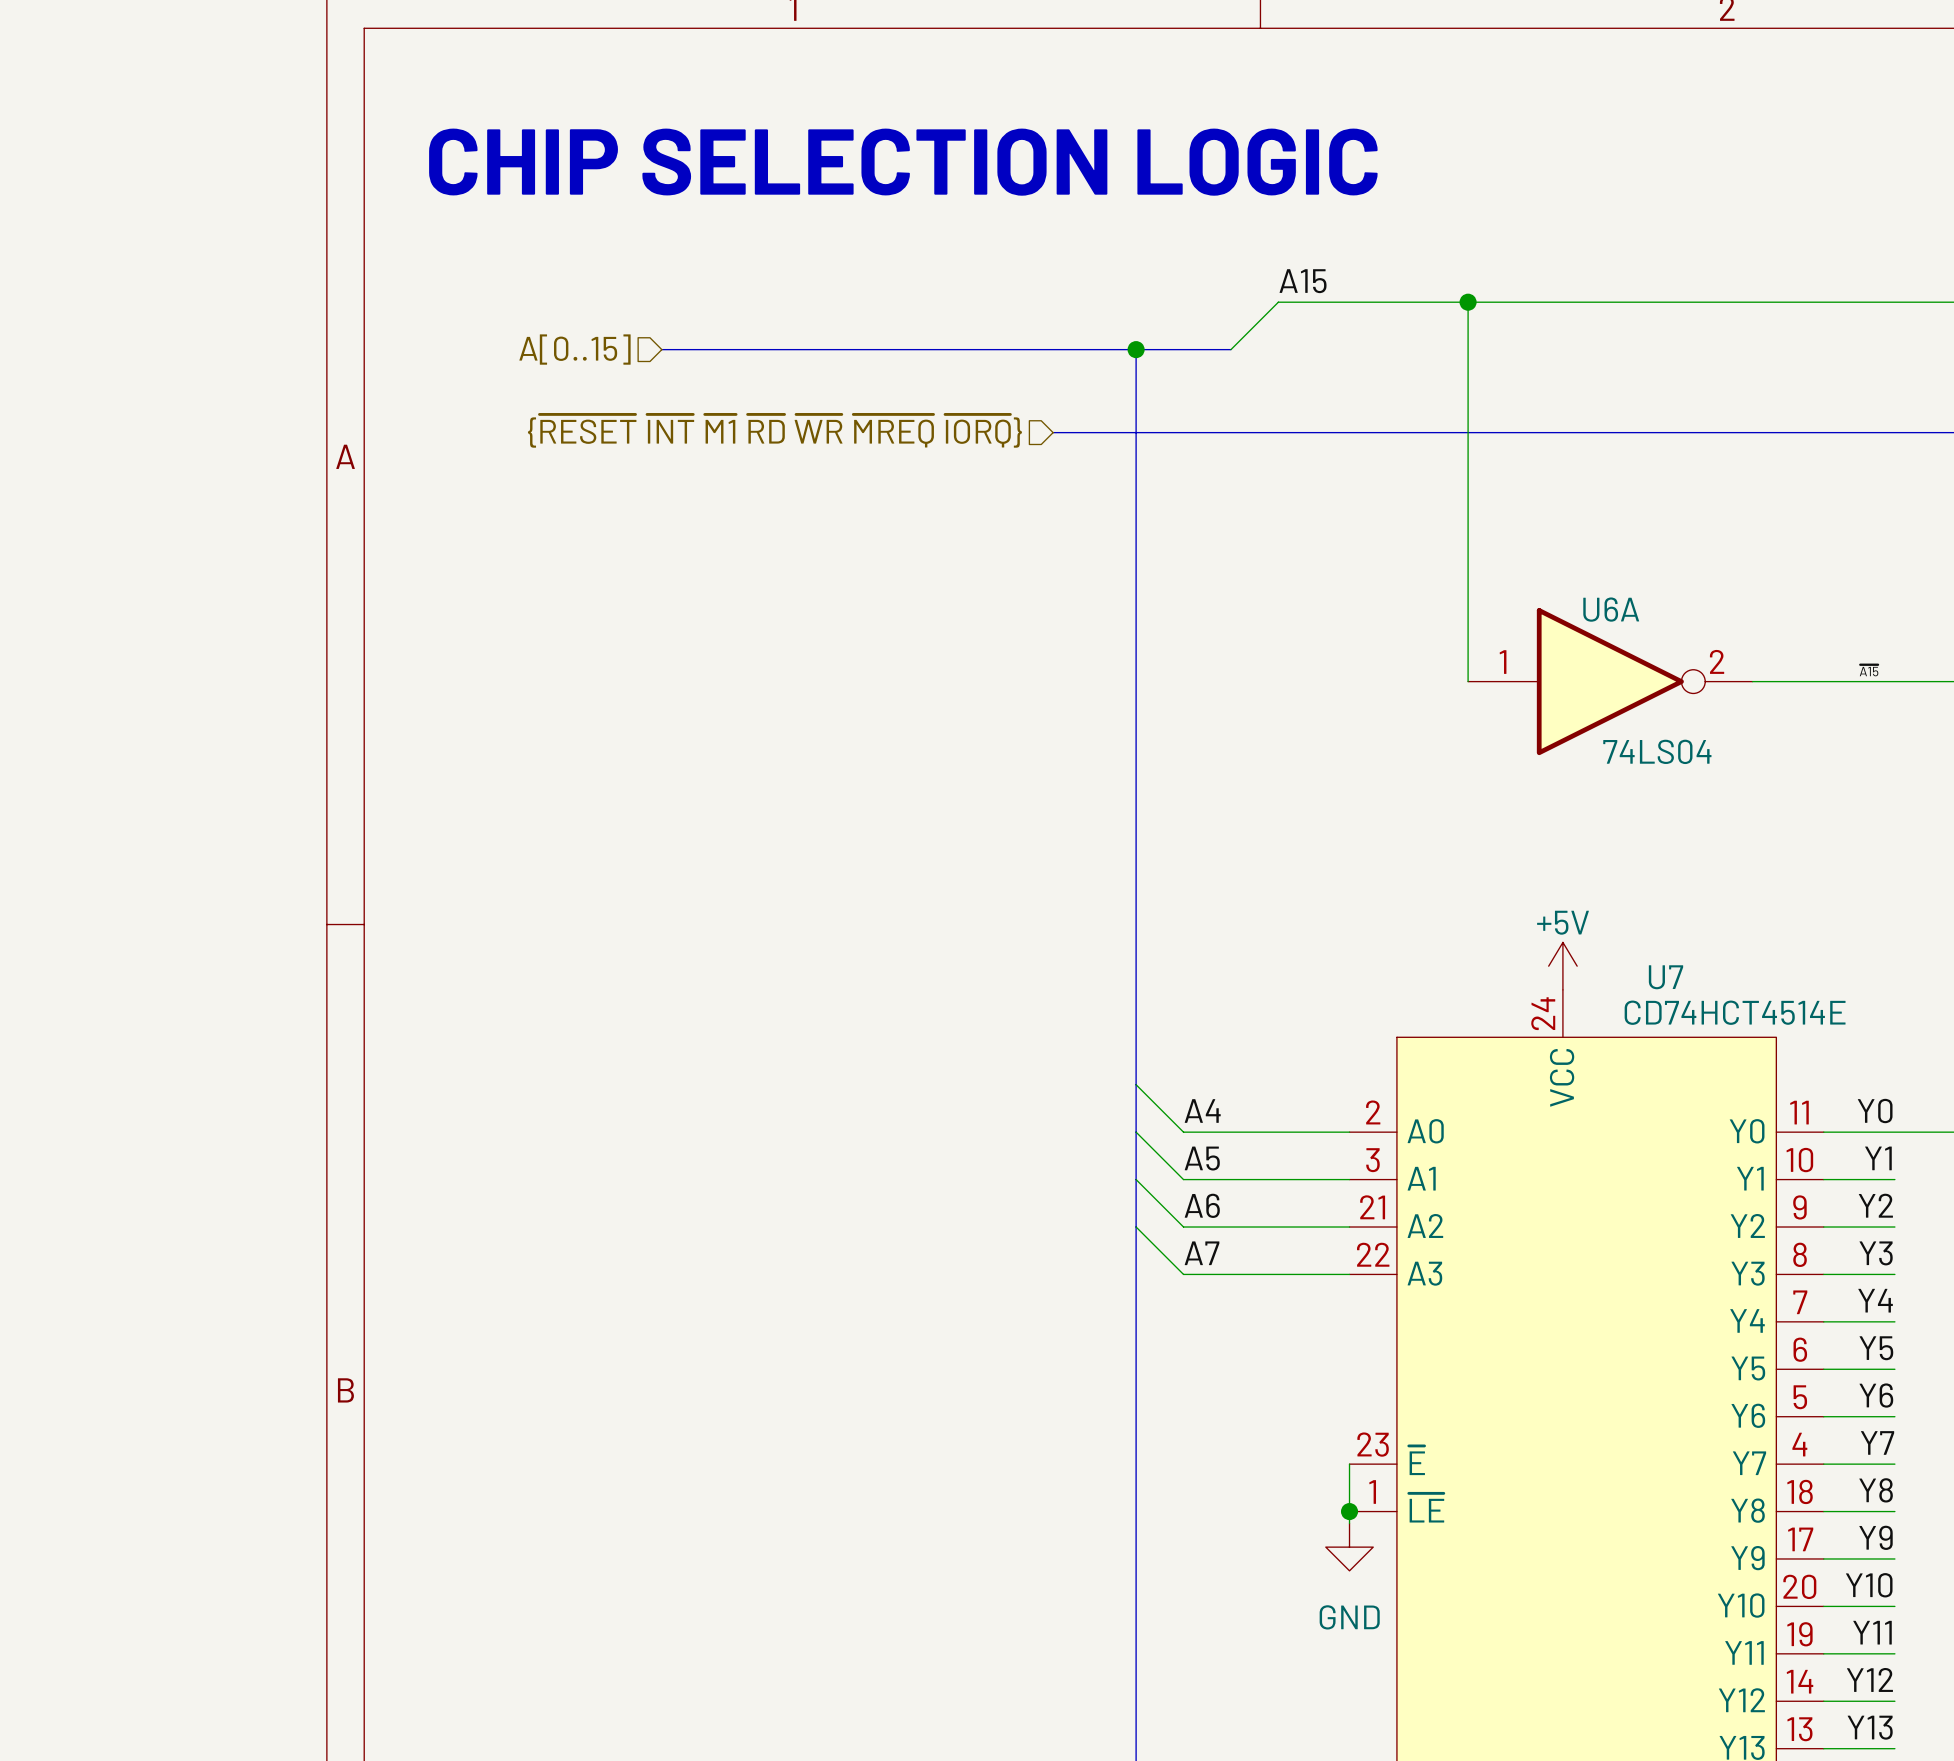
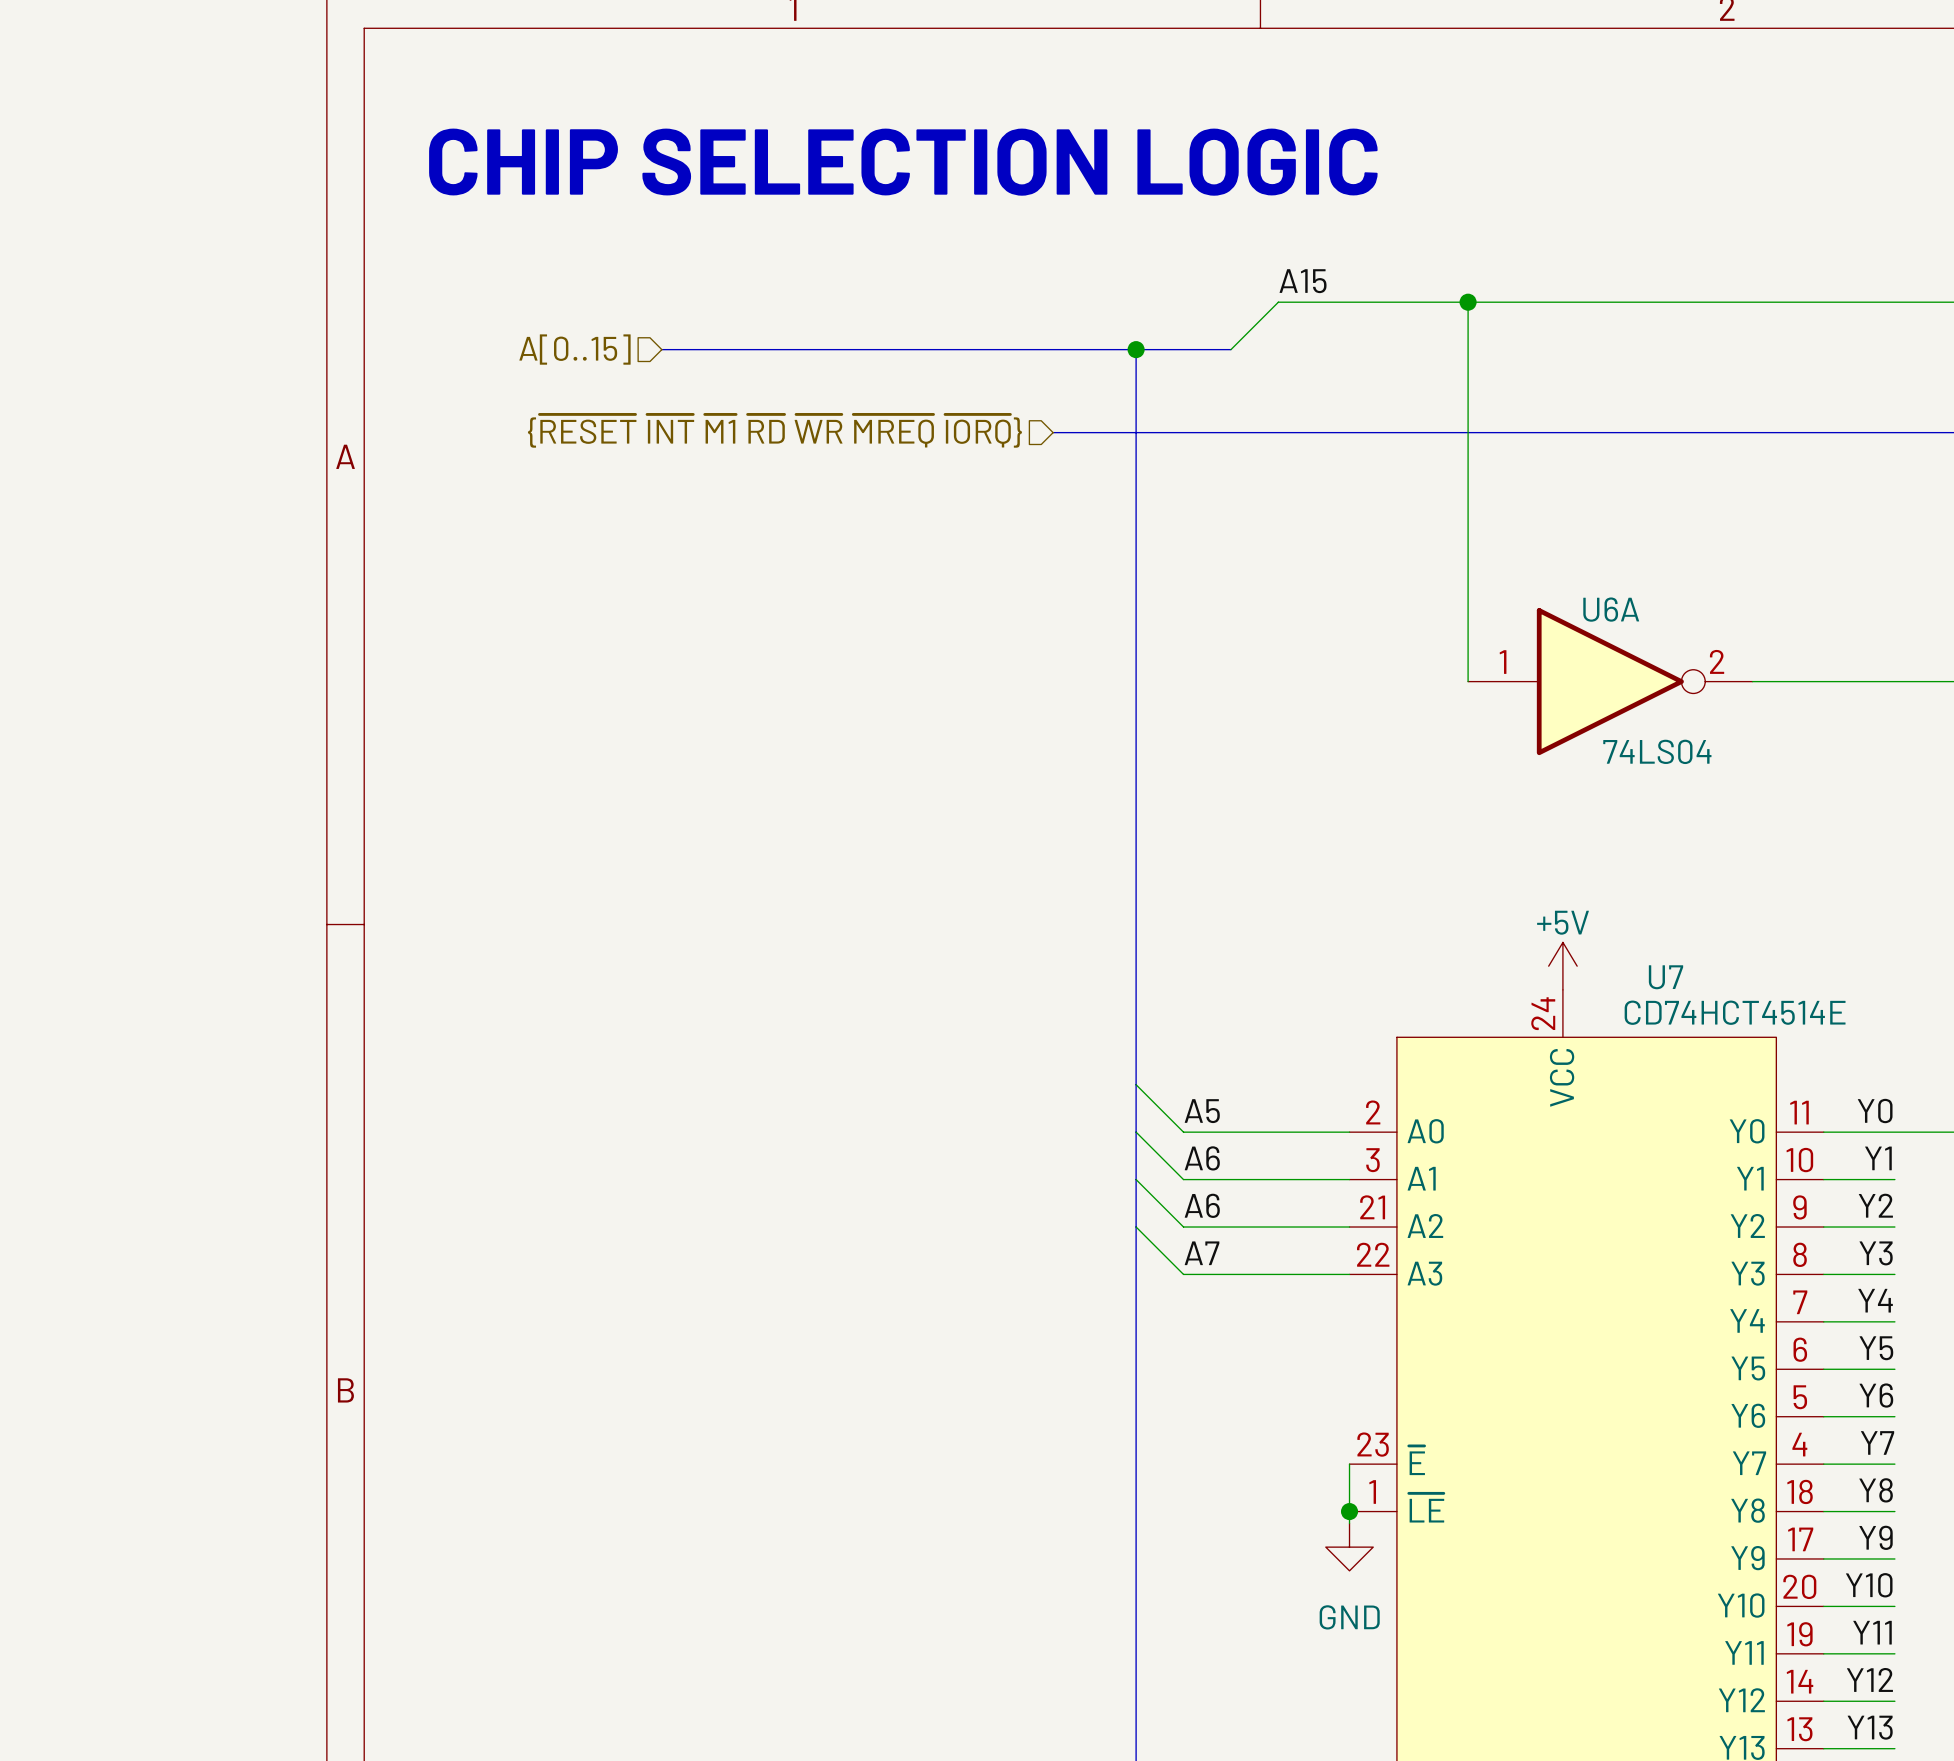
label: ~{A15} (1869, 670) -> none
label: A4 (1202, 1110) -> A5 (1202, 1111)
label: A5 (1202, 1158) -> A6 (1202, 1158)

